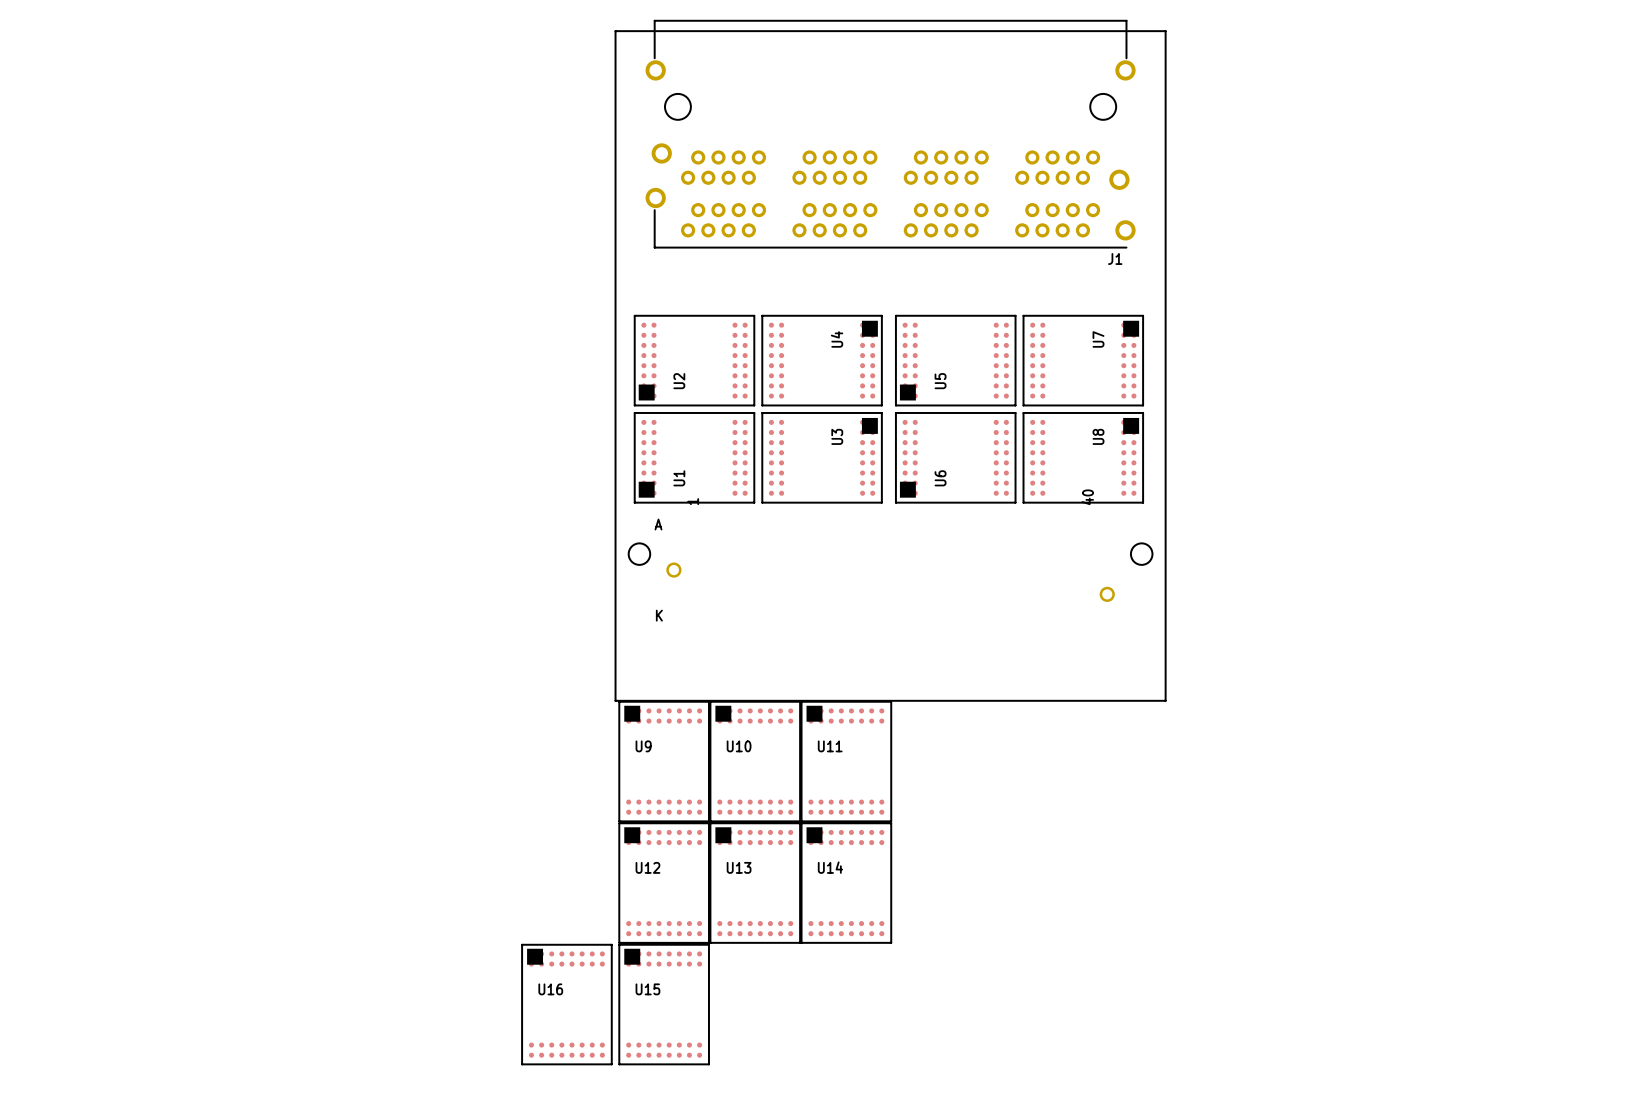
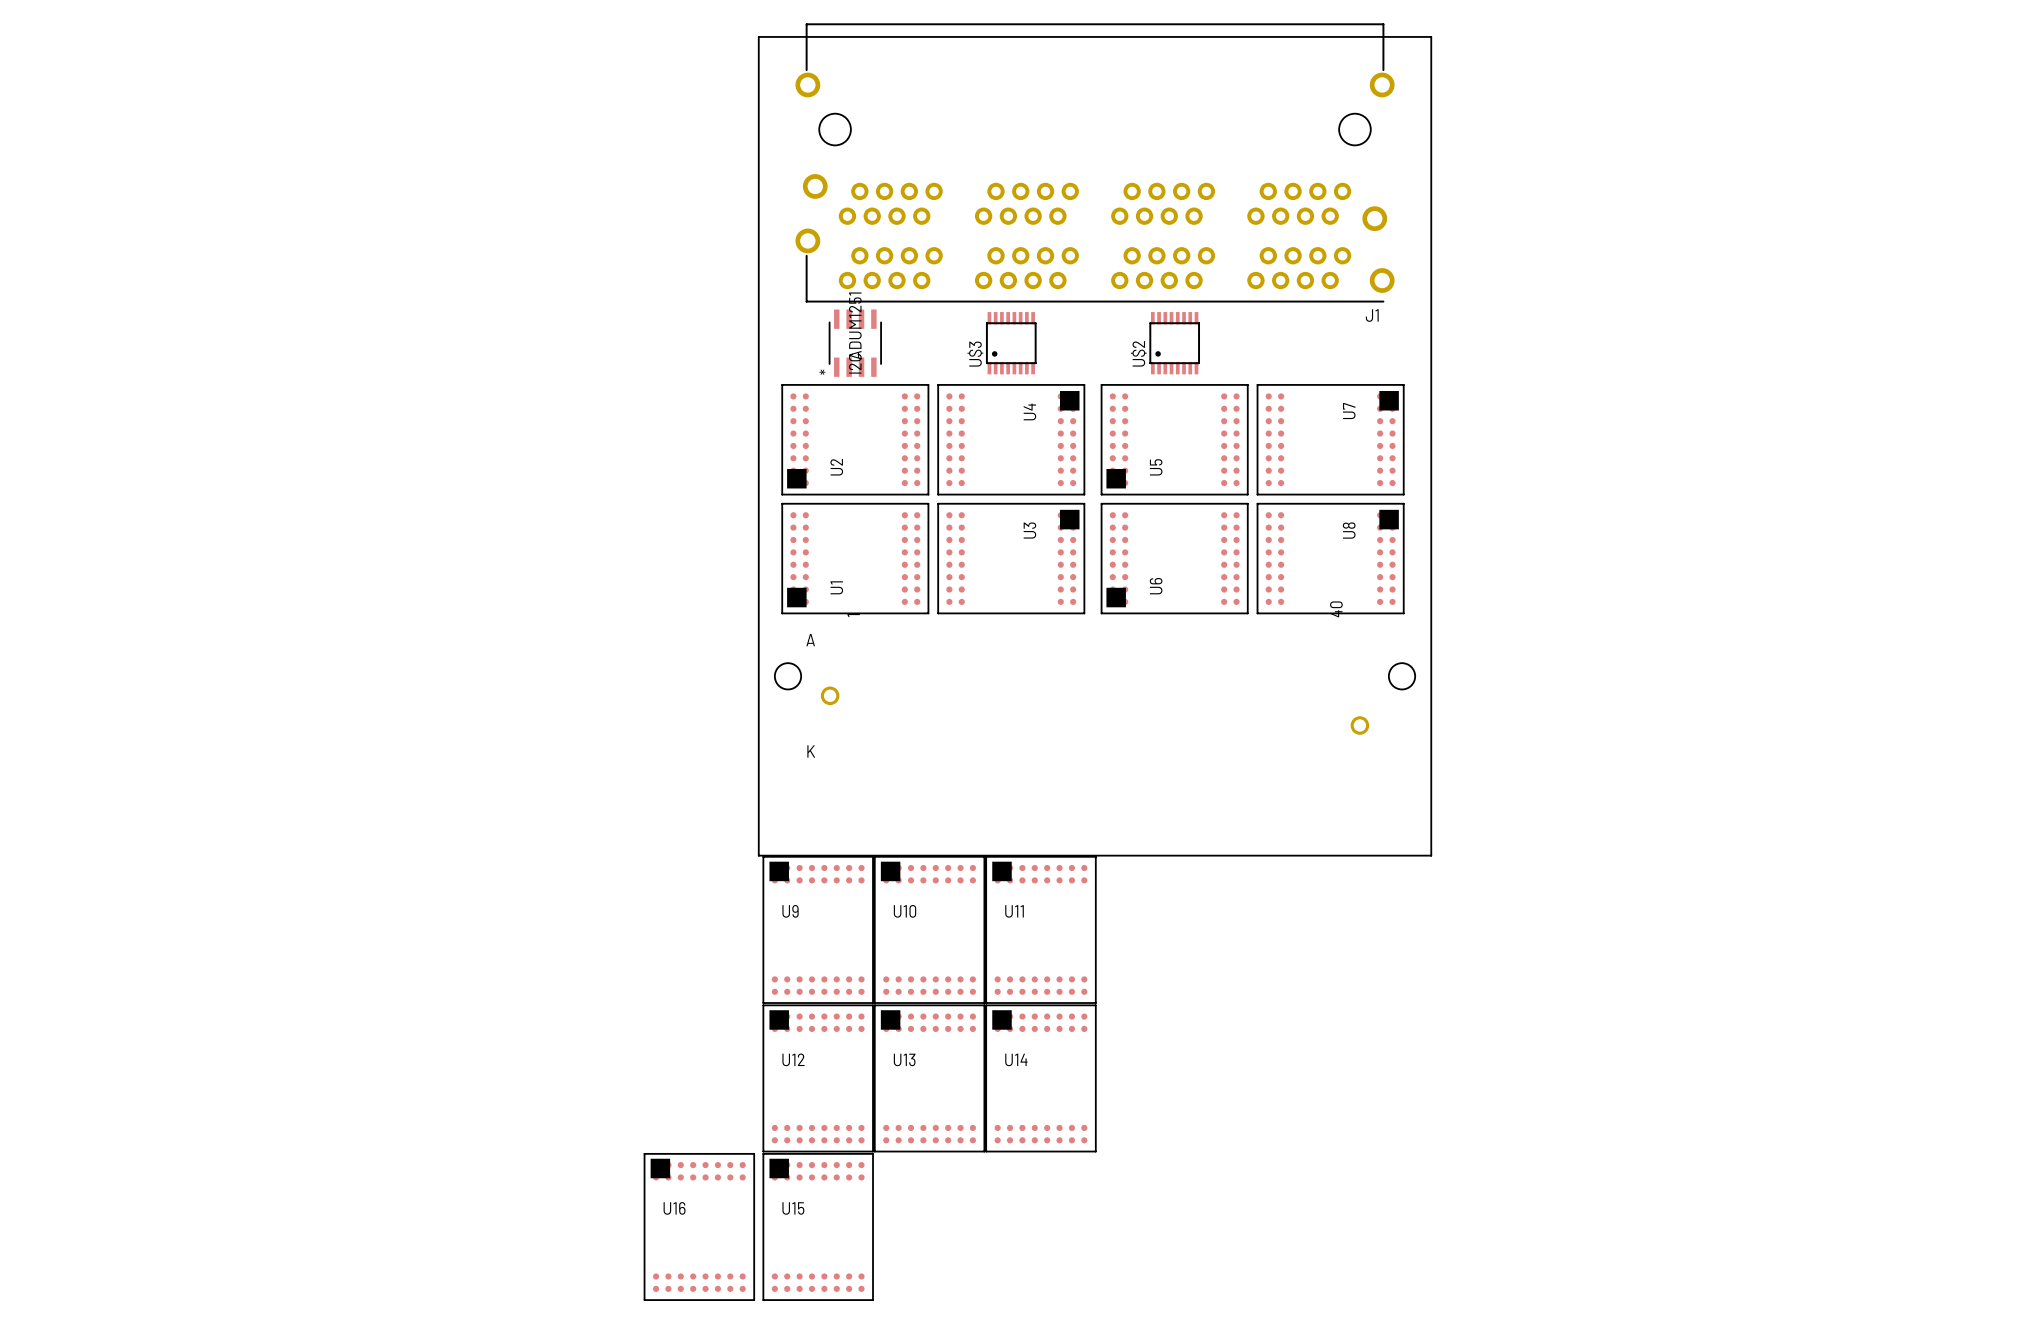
I2C: none -> ADUM1251 (855, 343)
U$3: none -> (1011, 343)
U$2: none -> (1174, 343)

